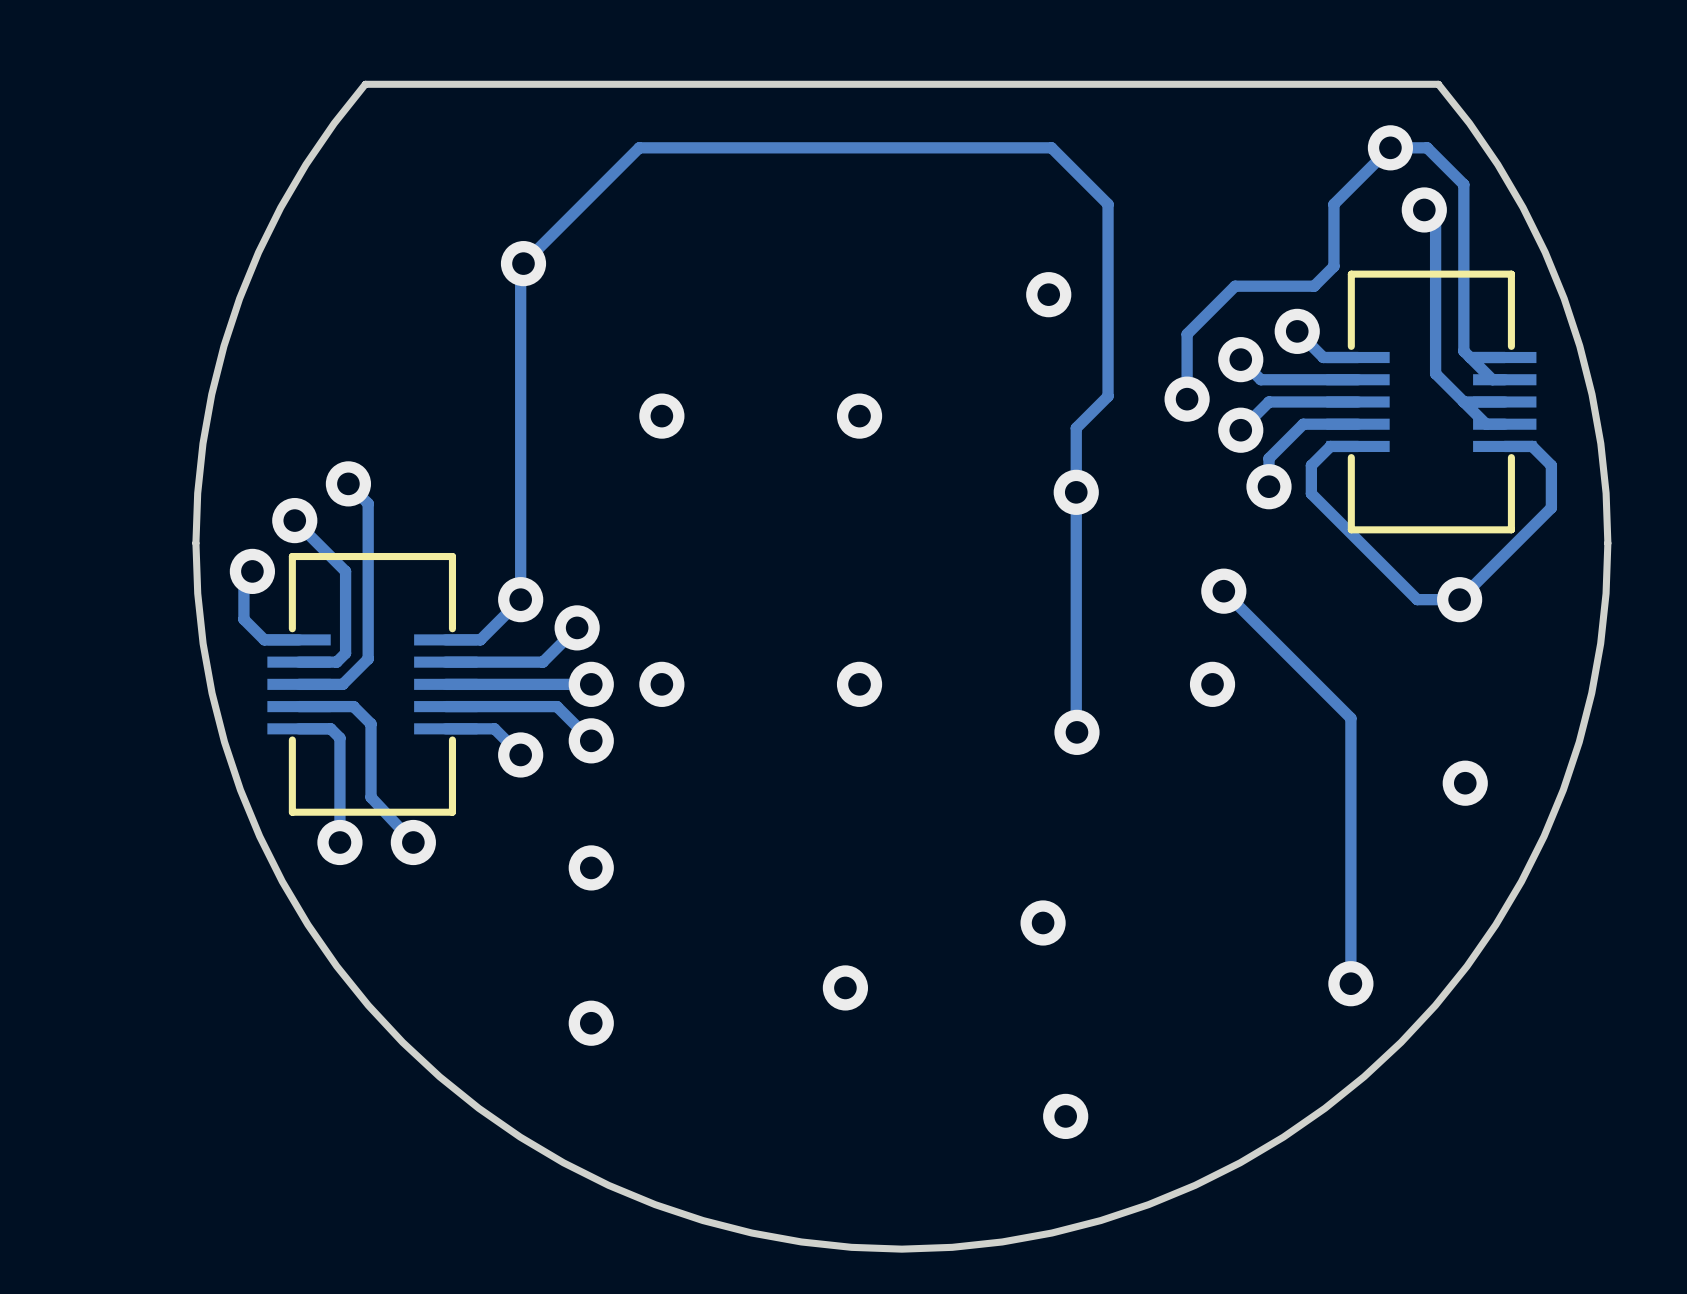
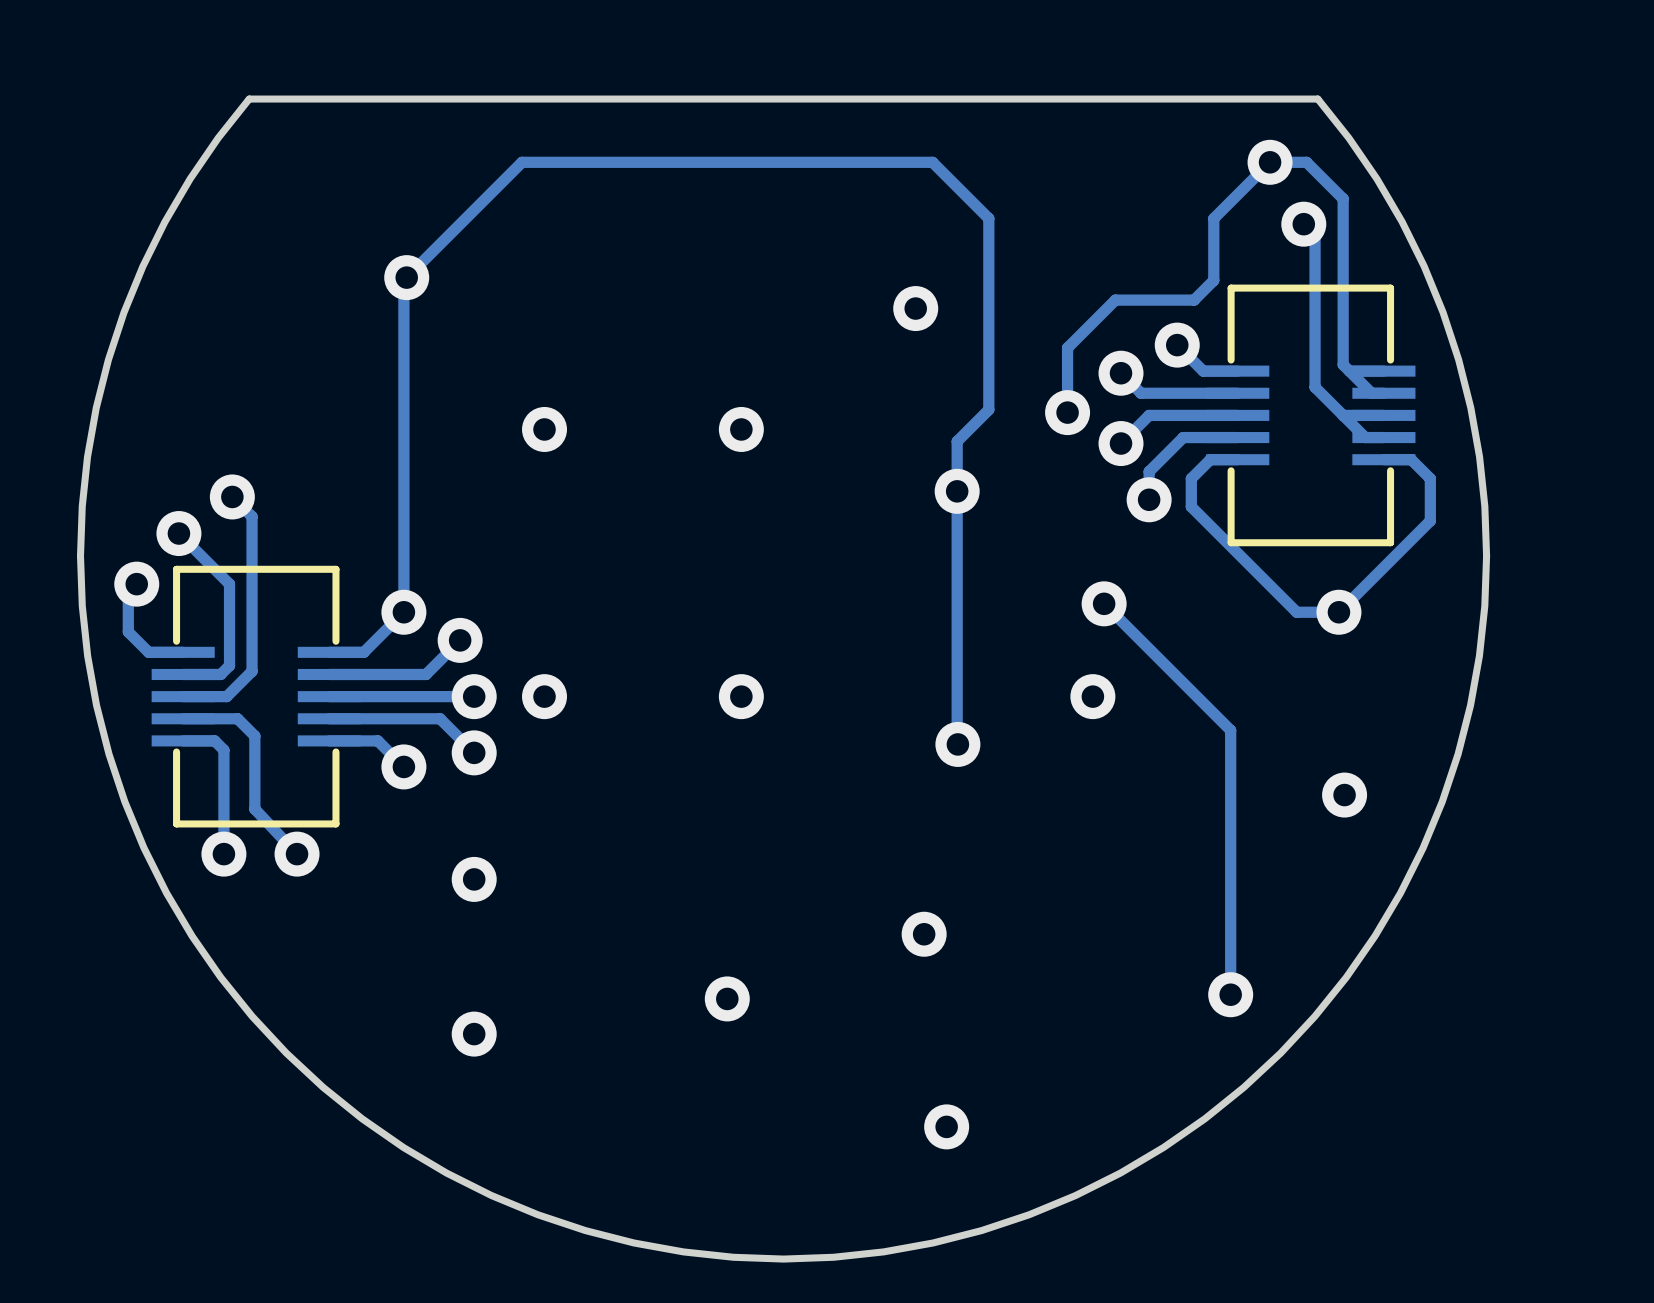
via position: (1048, 294) -> (915, 308)
via position: (1076, 492) -> (957, 491)

